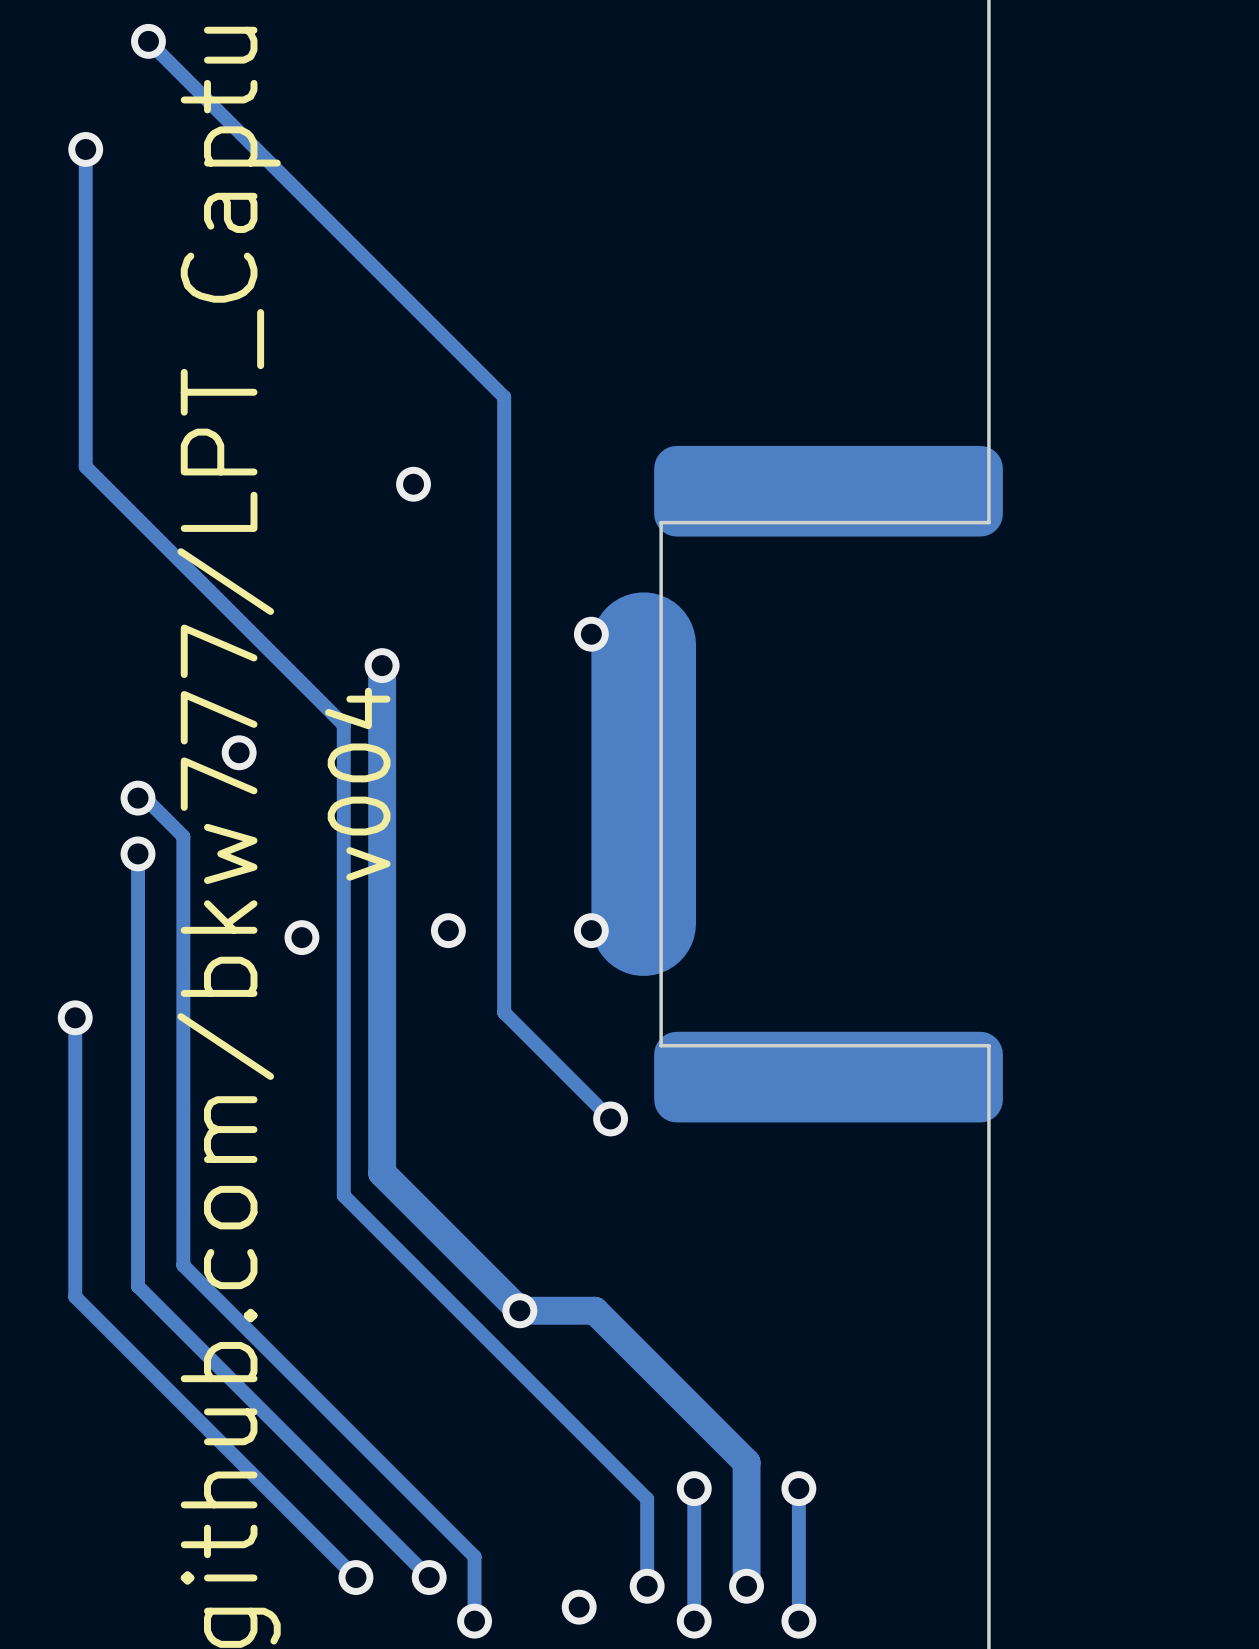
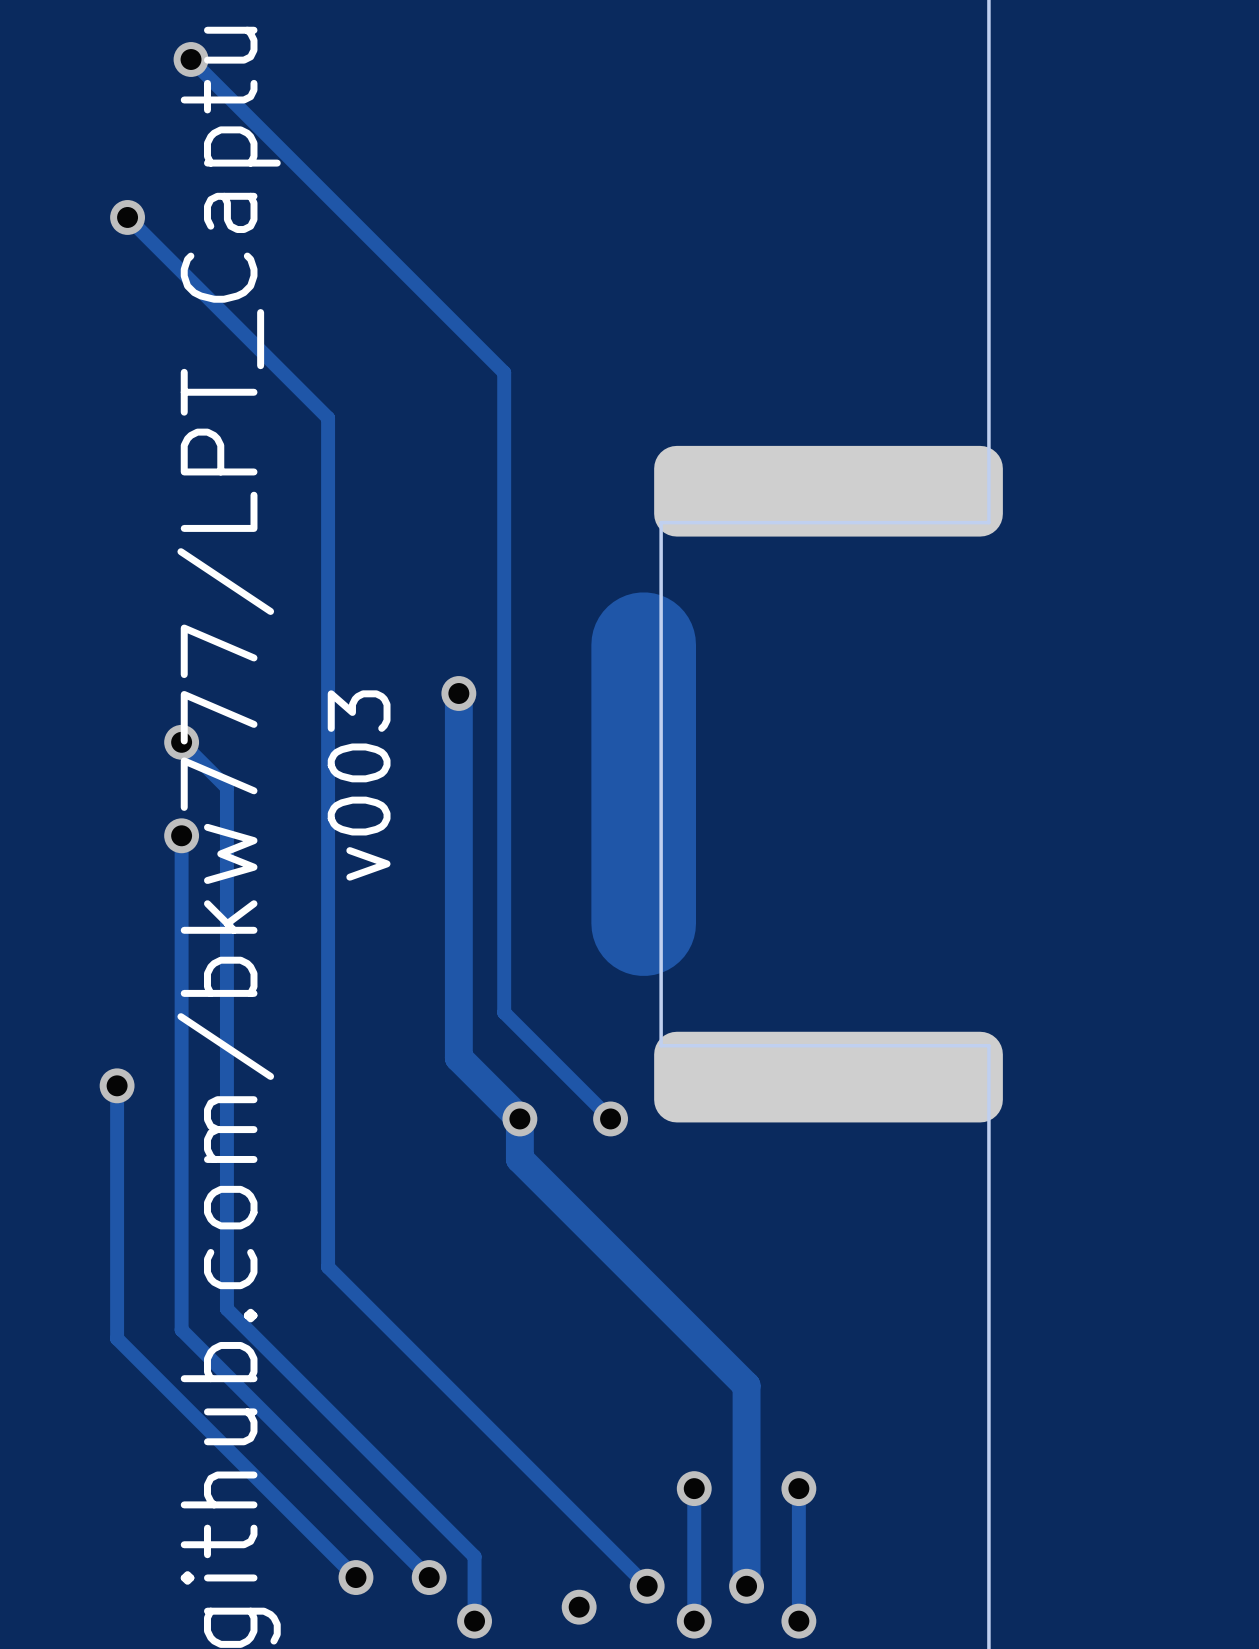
track: (148, 41) (504, 397) -> (191, 59) (504, 372) (504, 397)
via position: (148, 41) -> (191, 59)
track: (85, 149) (85, 466) (343, 724) (343, 1195) (647, 1499) (647, 1586) -> (127, 217) (328, 418) (328, 1267) (647, 1586)
via: (85, 149) -> none
via: none -> (127, 217)
via: (413, 484) -> none
via: (591, 634) -> none
track: (382, 665) (382, 1173) (519, 1310) (594, 1310) (746, 1462) -> (458, 693) (458, 1057) (519, 1118) (519, 1159) (746, 1385) (746, 1462)
via: (382, 665) -> none
via: none -> (458, 693)
via: none -> (181, 742)
via: (239, 752) -> none
text: v004 (357, 784) -> v003 (359, 785)
track: (138, 798) (144, 798) (183, 836) (183, 1265) (226, 1309) -> (181, 742) (226, 787) (226, 1309)
via: (138, 798) -> none
via: none -> (181, 835)
track: (138, 853) (138, 1286) (181, 1329) -> (181, 835) (181, 1329)
via: (138, 853) -> none
via: (448, 930) -> none
via: (591, 930) -> none
via: (301, 937) -> none
track: (75, 1017) (75, 1296) (117, 1338) -> (117, 1085) (117, 1338)
via position: (75, 1017) -> (117, 1085)
via: none -> (519, 1118)
via: (519, 1310) -> none

